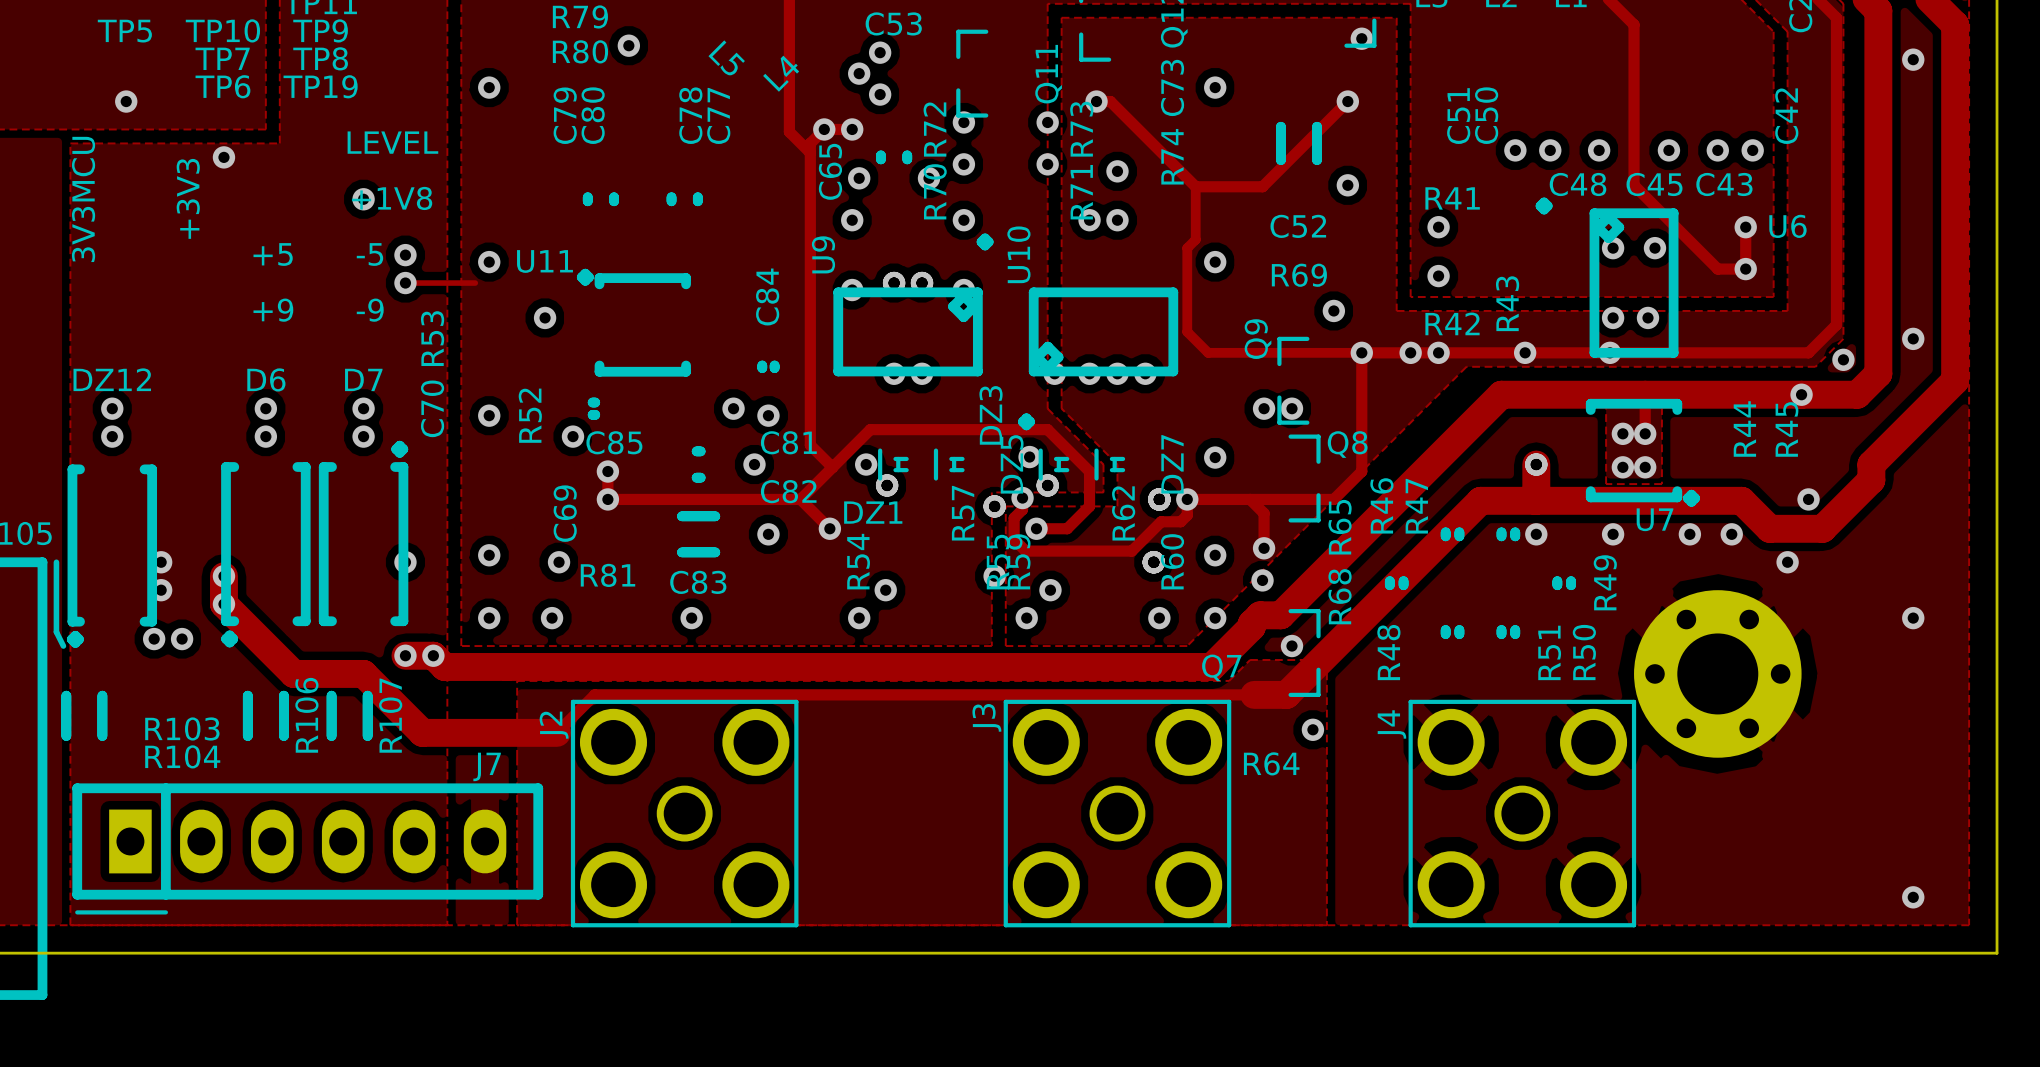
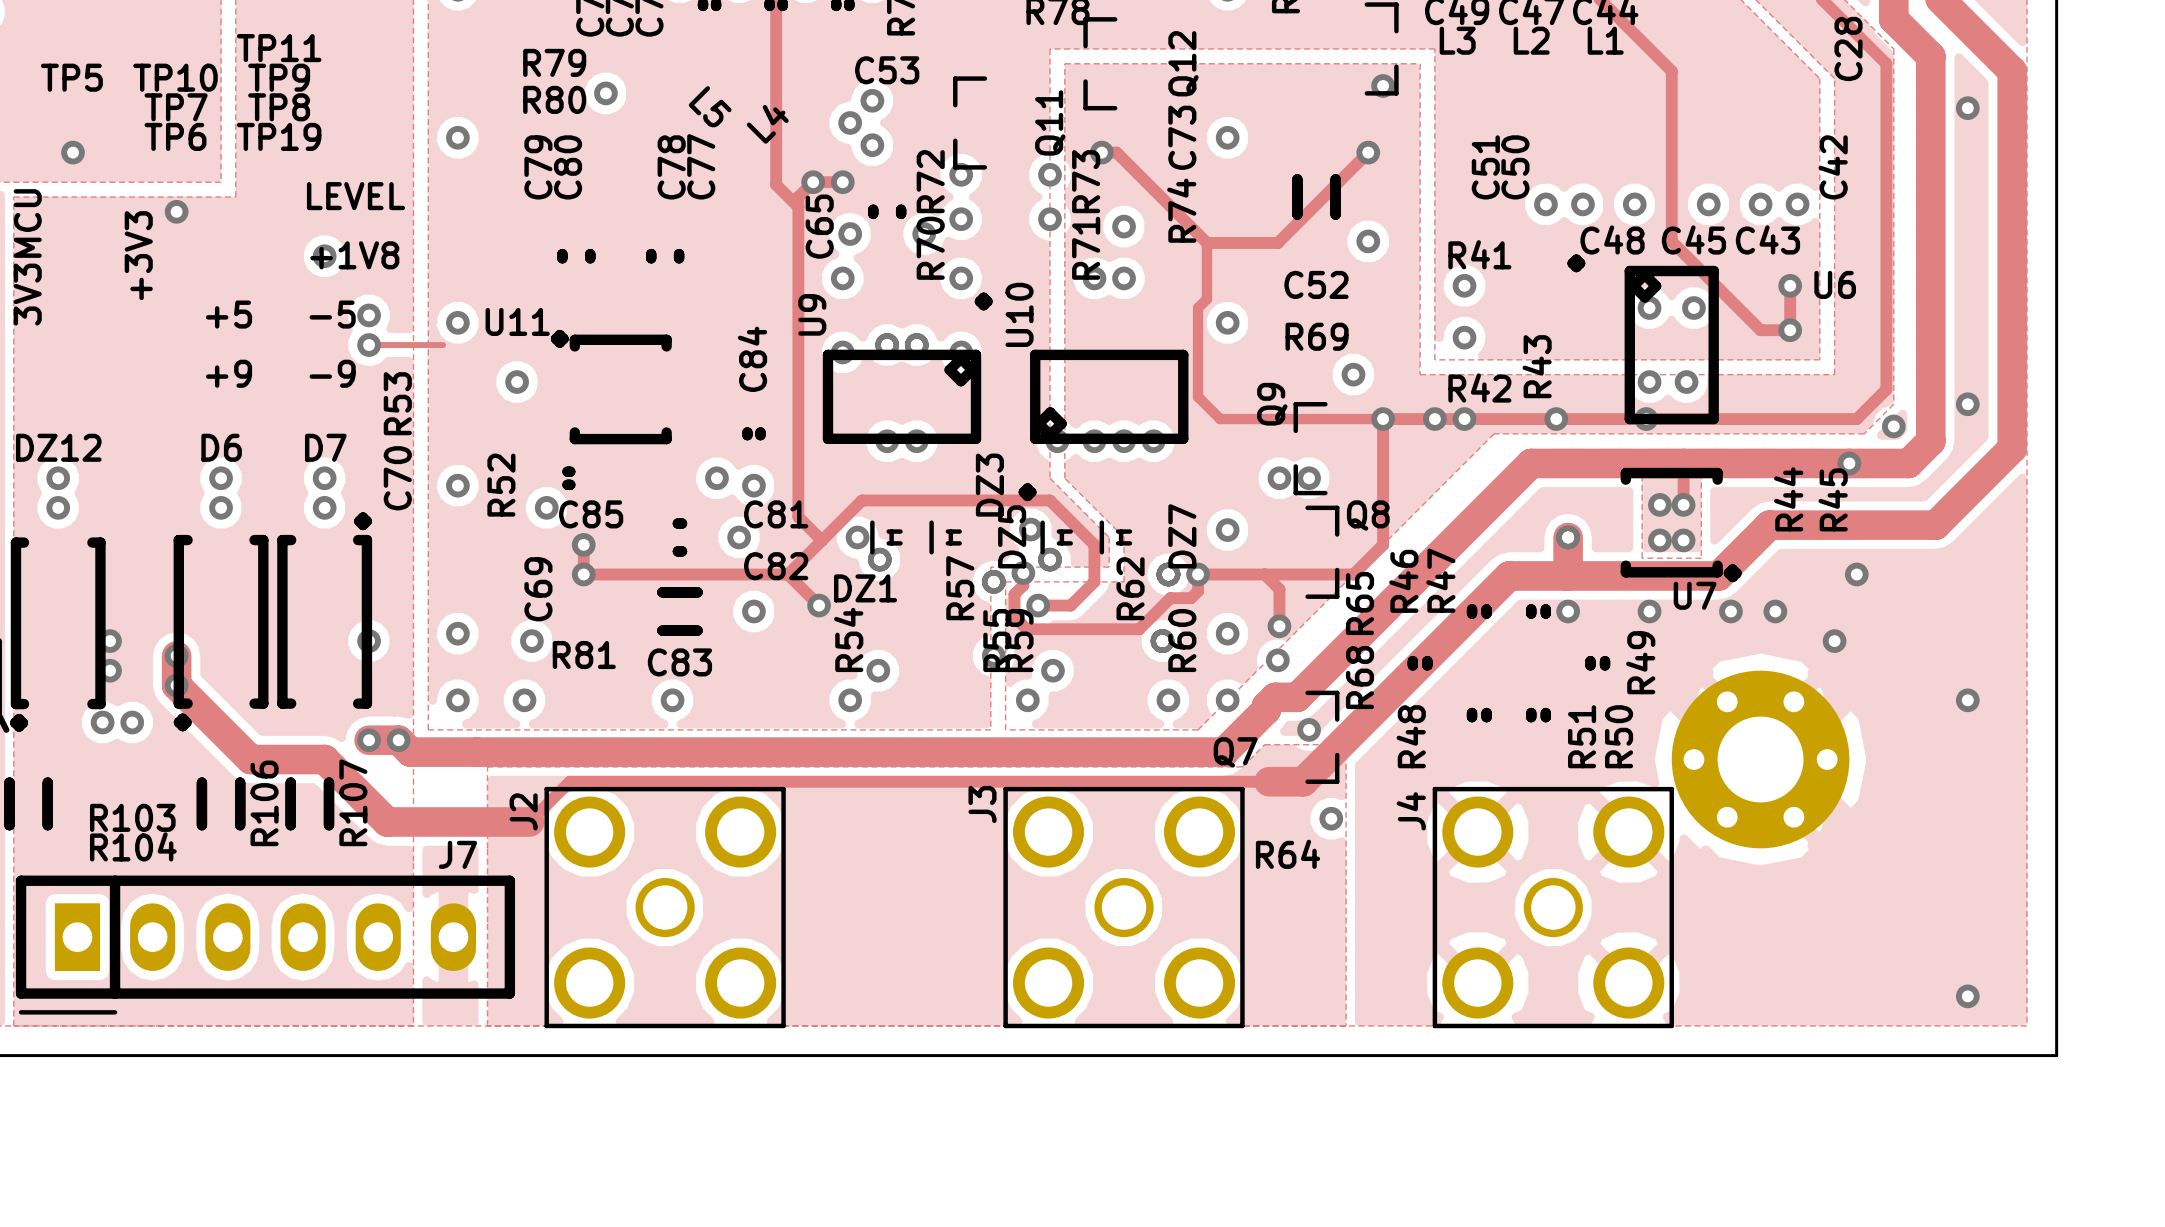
track: (1882, 452) (1871, 464) (1871, 480) (1822, 528) (1769, 528) (1741, 500) (1678, 500) -> (1935, 525) (1769, 525) (1718, 575)

